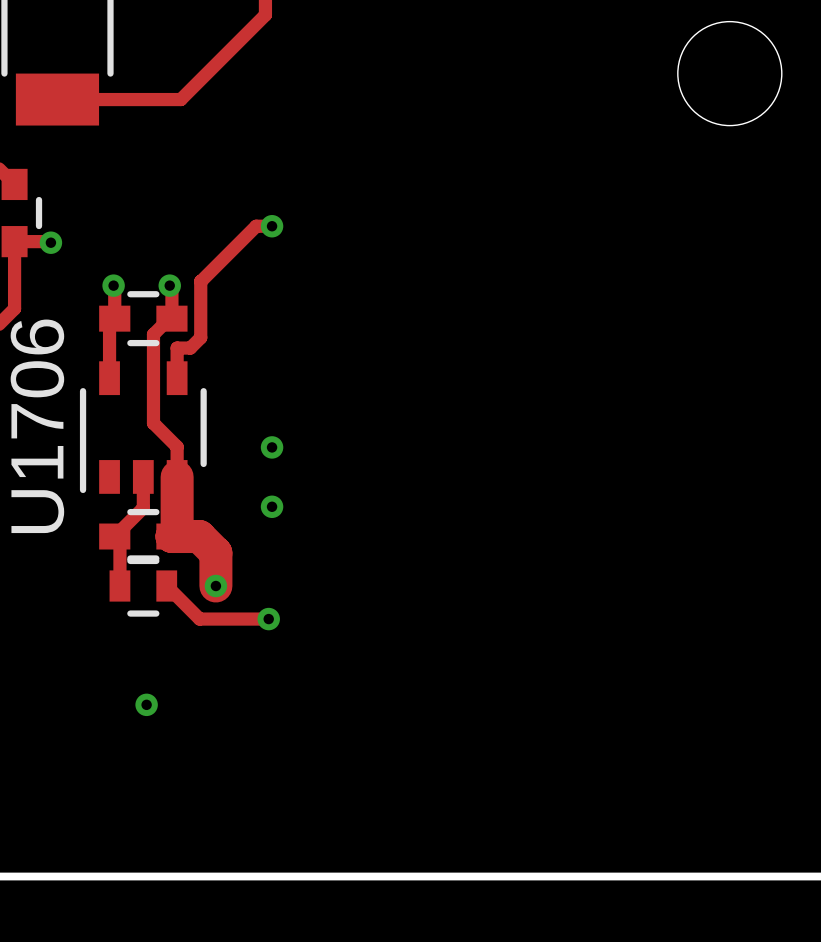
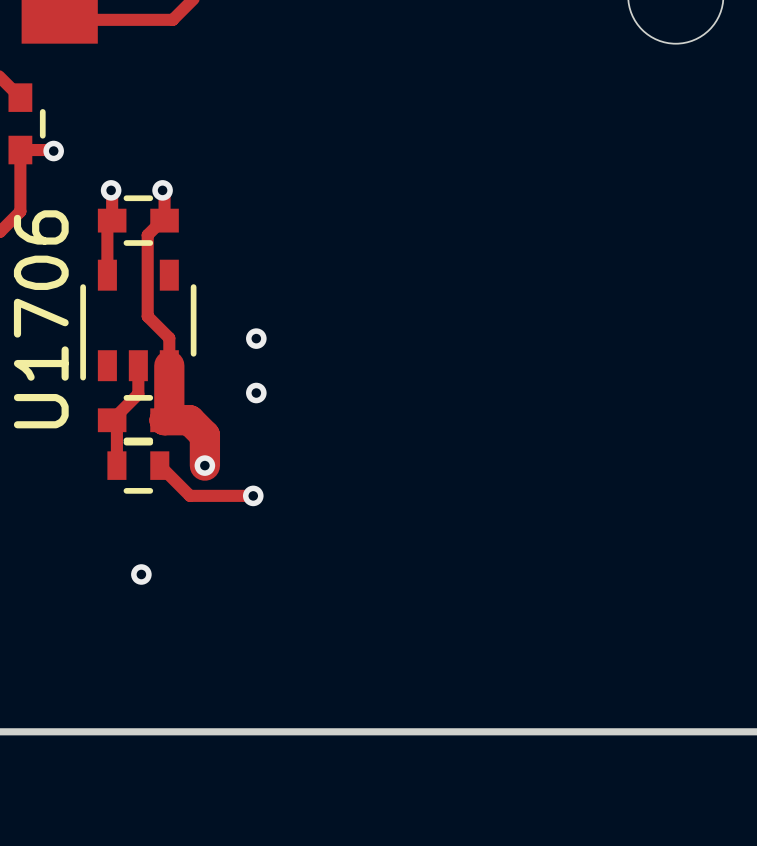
track: (272, 226) (256, 226) (201, 281) -> none
via: (272, 226) -> none
track: (200, 281) (200, 337) (190, 348) (177, 348) (177, 378) -> none

